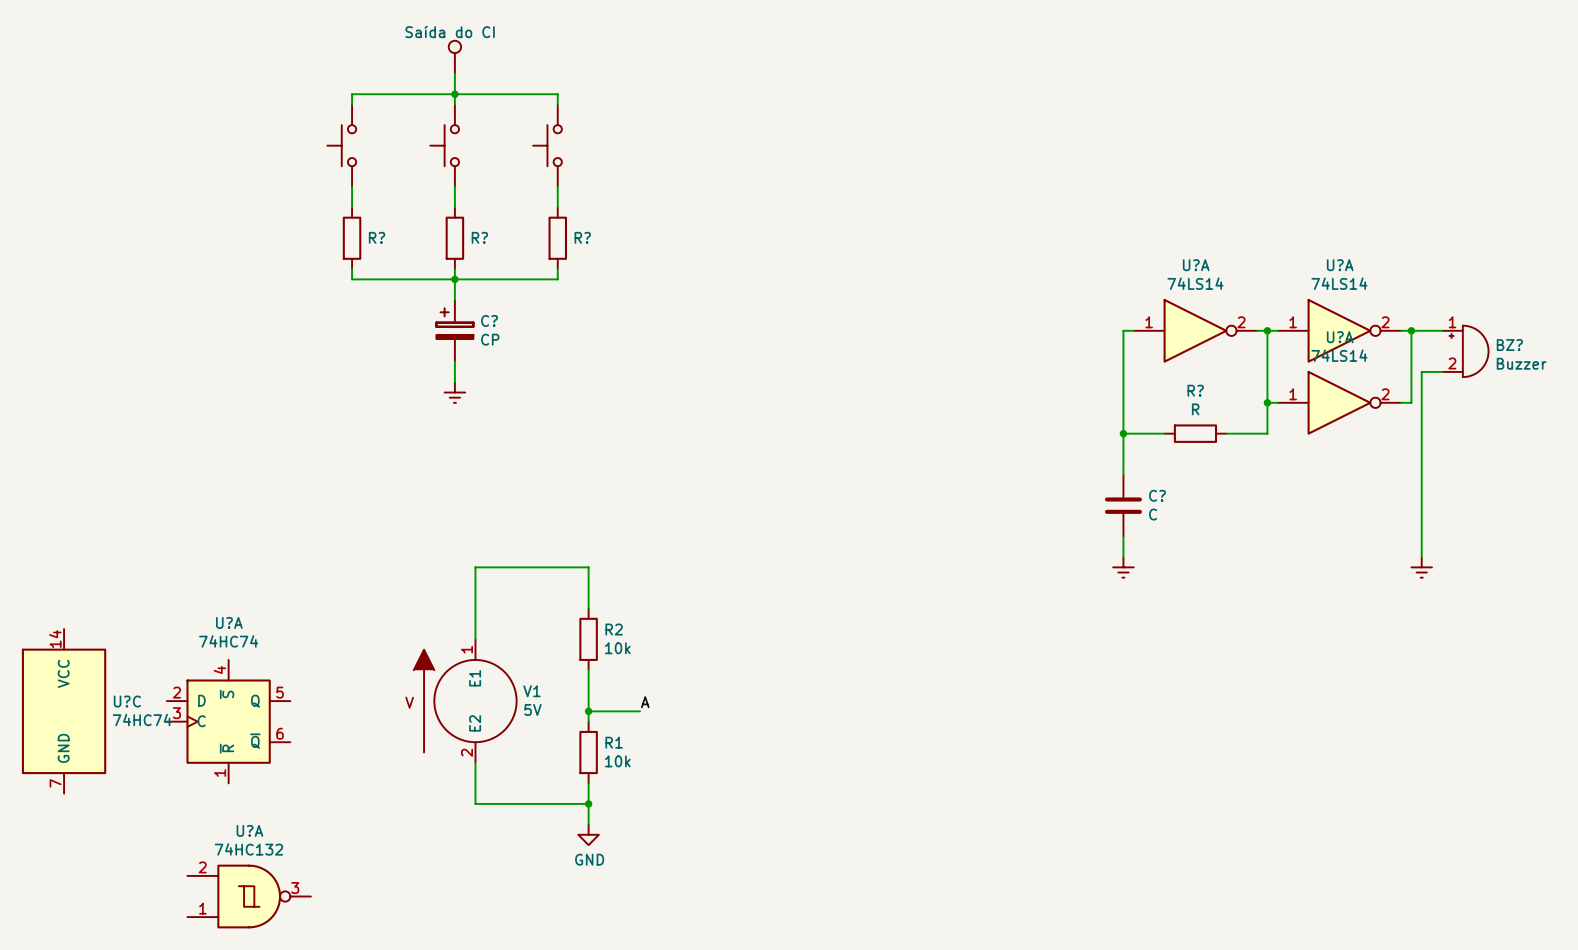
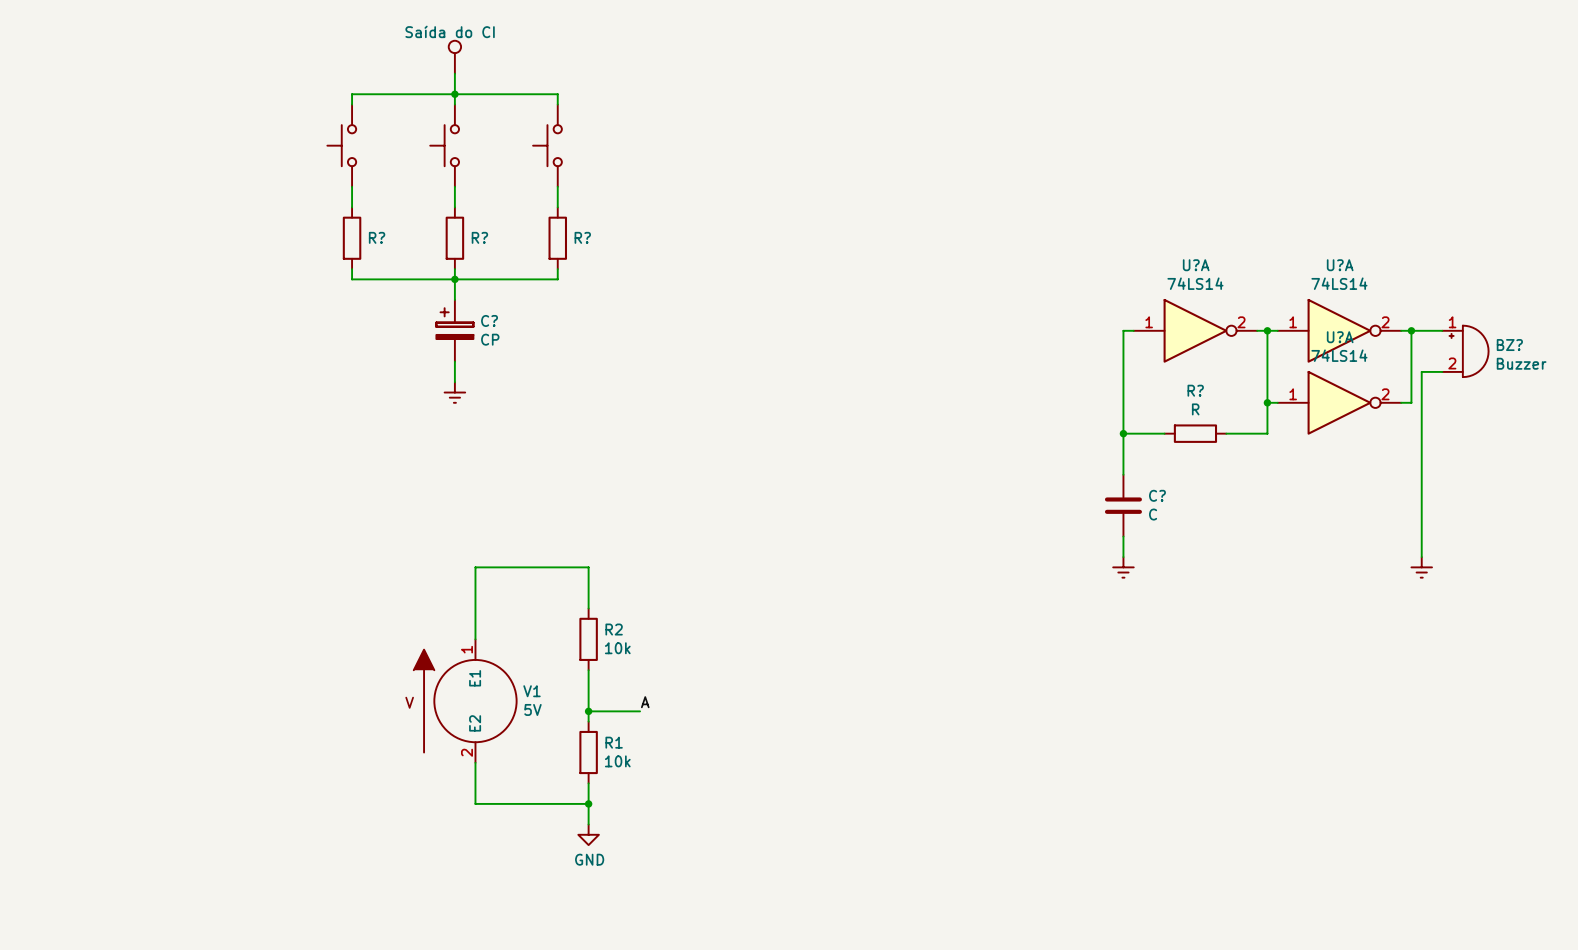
U?C: 74HC74 (64, 711) -> none
U?A: 74HC74 (228, 721) -> none
U?A: 74HC132 (249, 896) -> none

